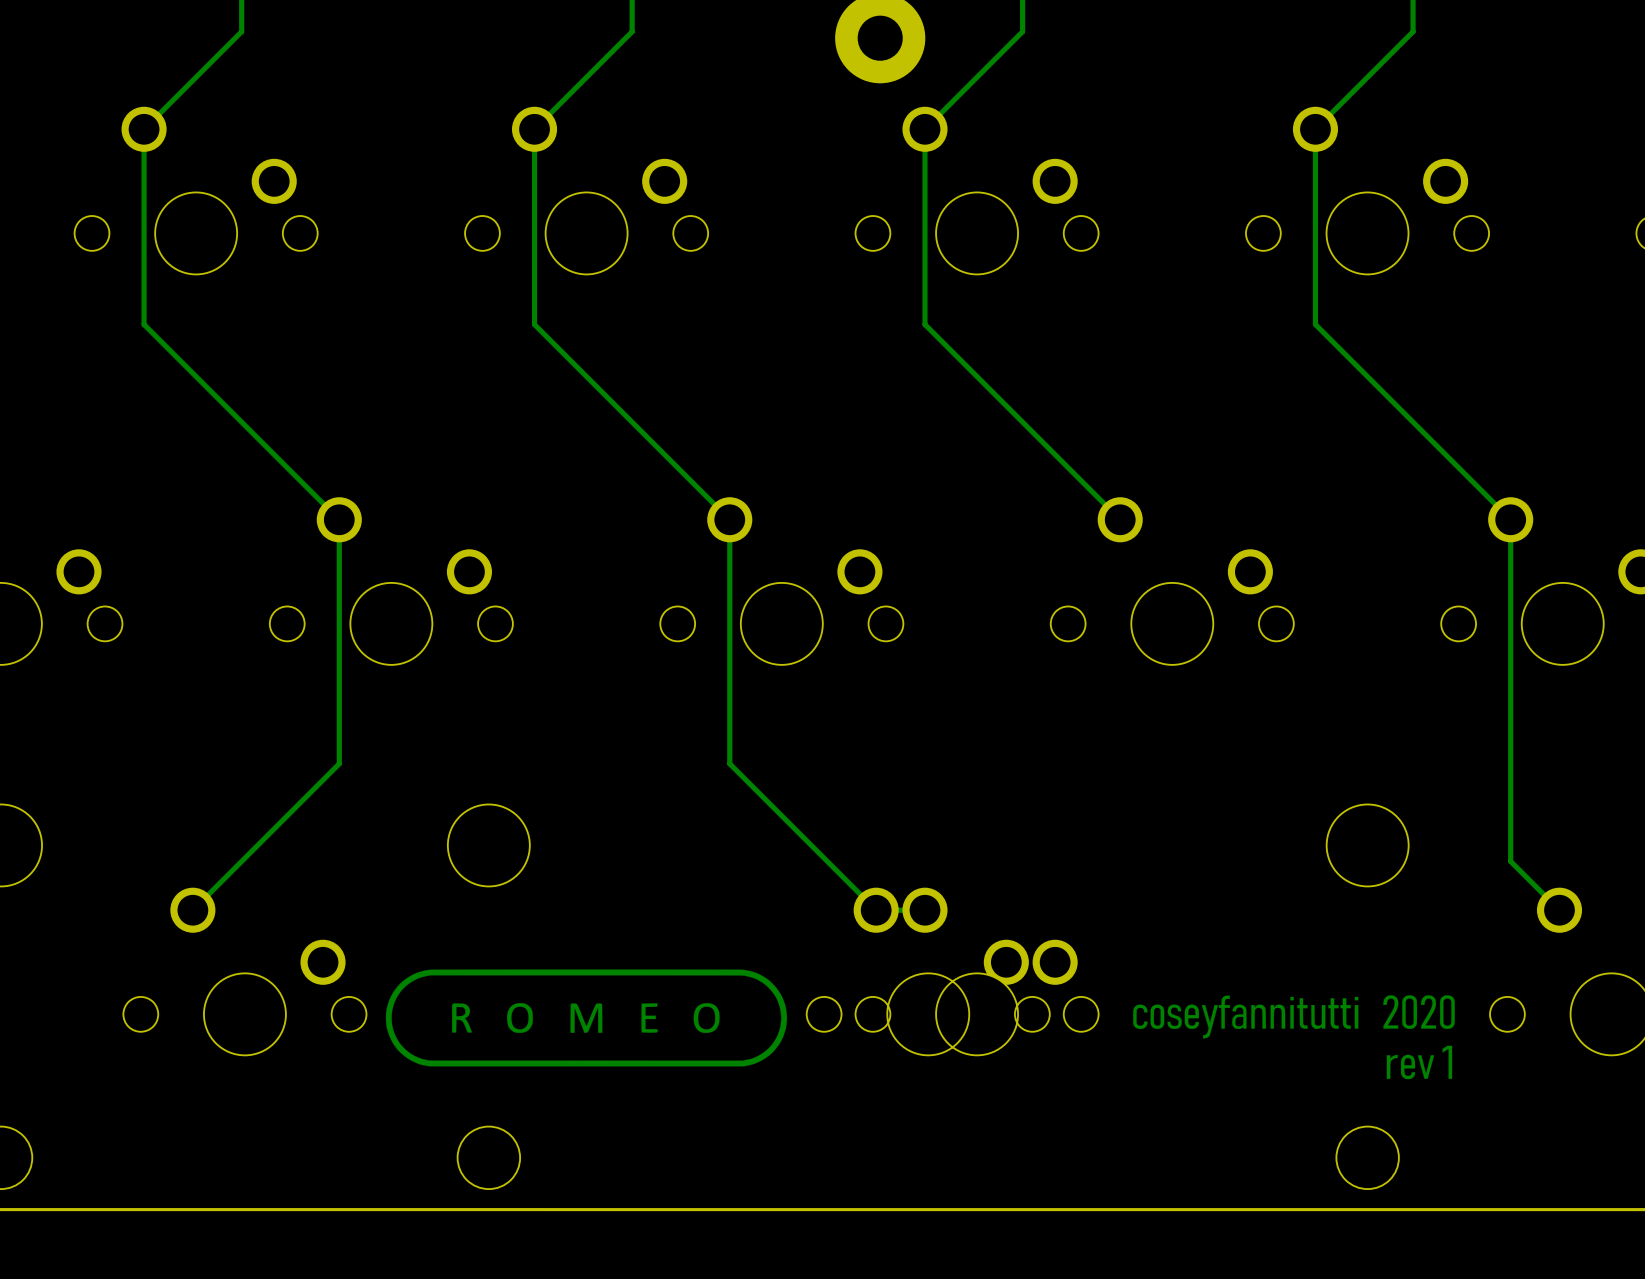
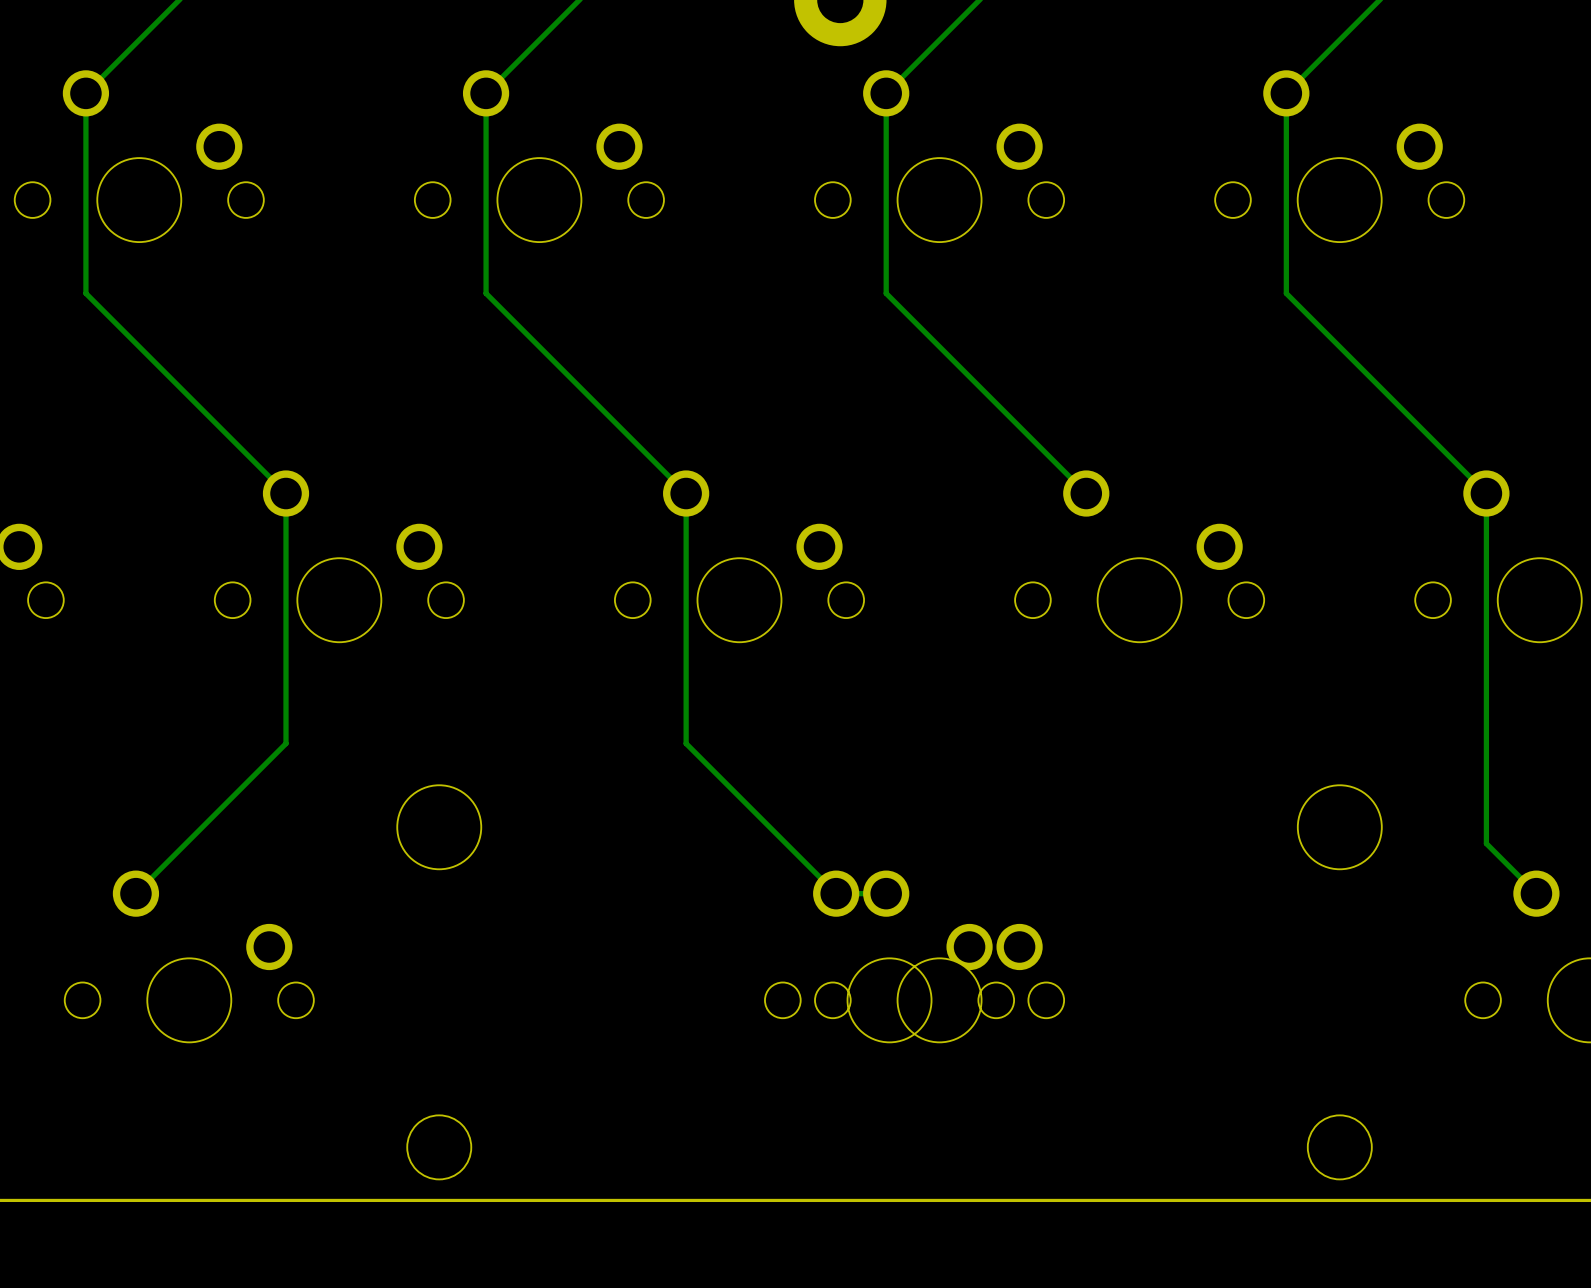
drawing: [385, 969, 788, 1067] -> none
drawing: [1133, 995, 1455, 1080] -> none

